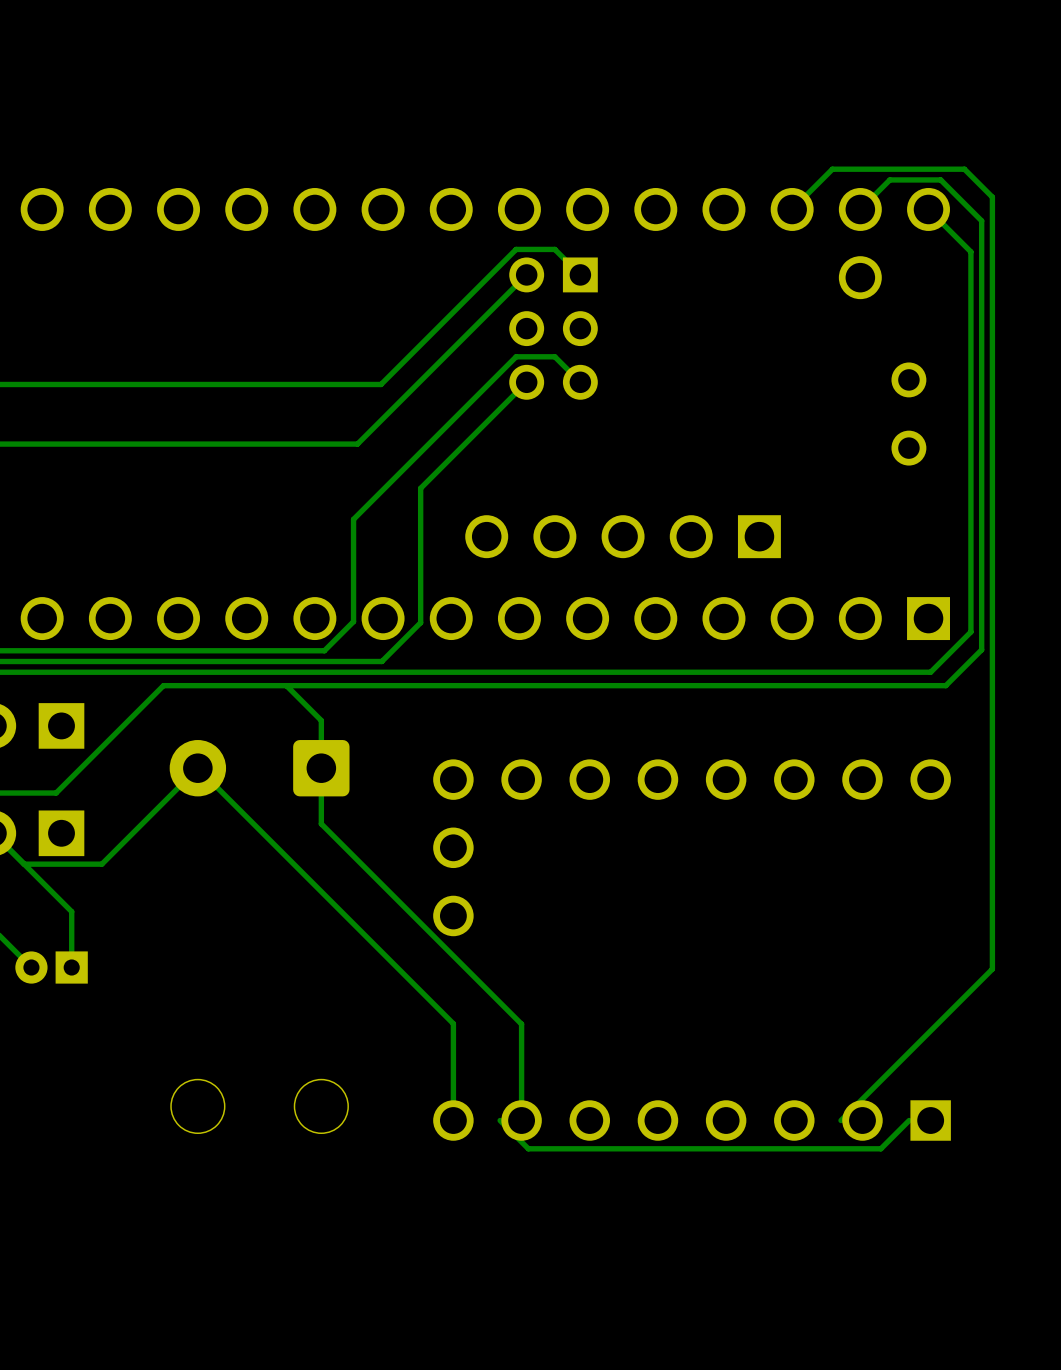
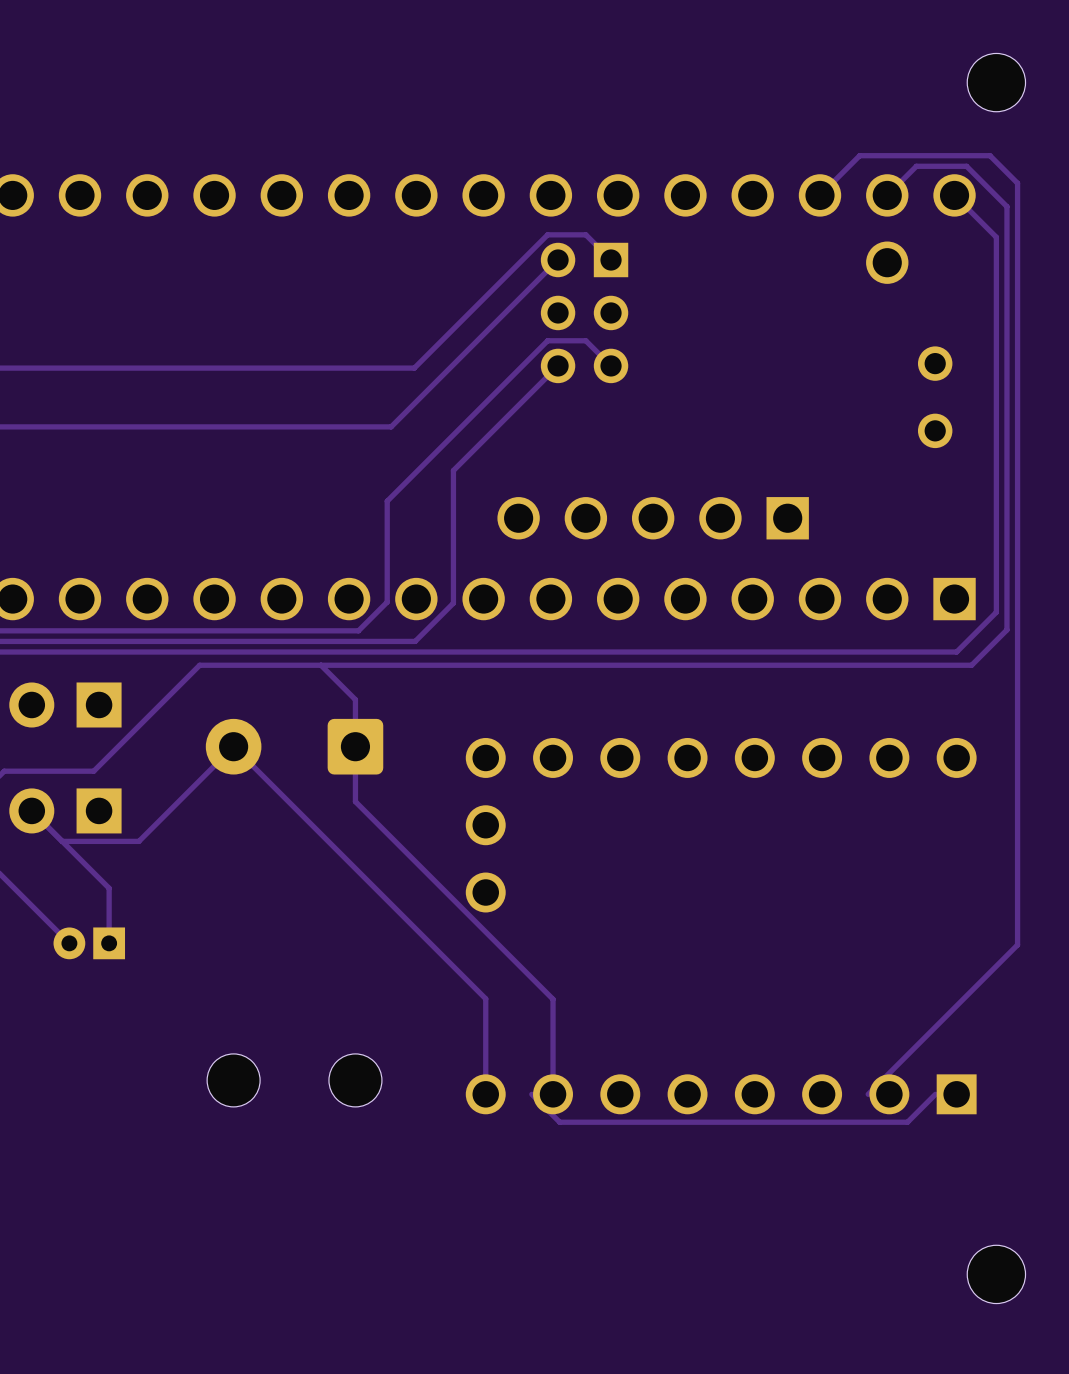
part: none -> (996, 82)
part: none -> (996, 1274)

